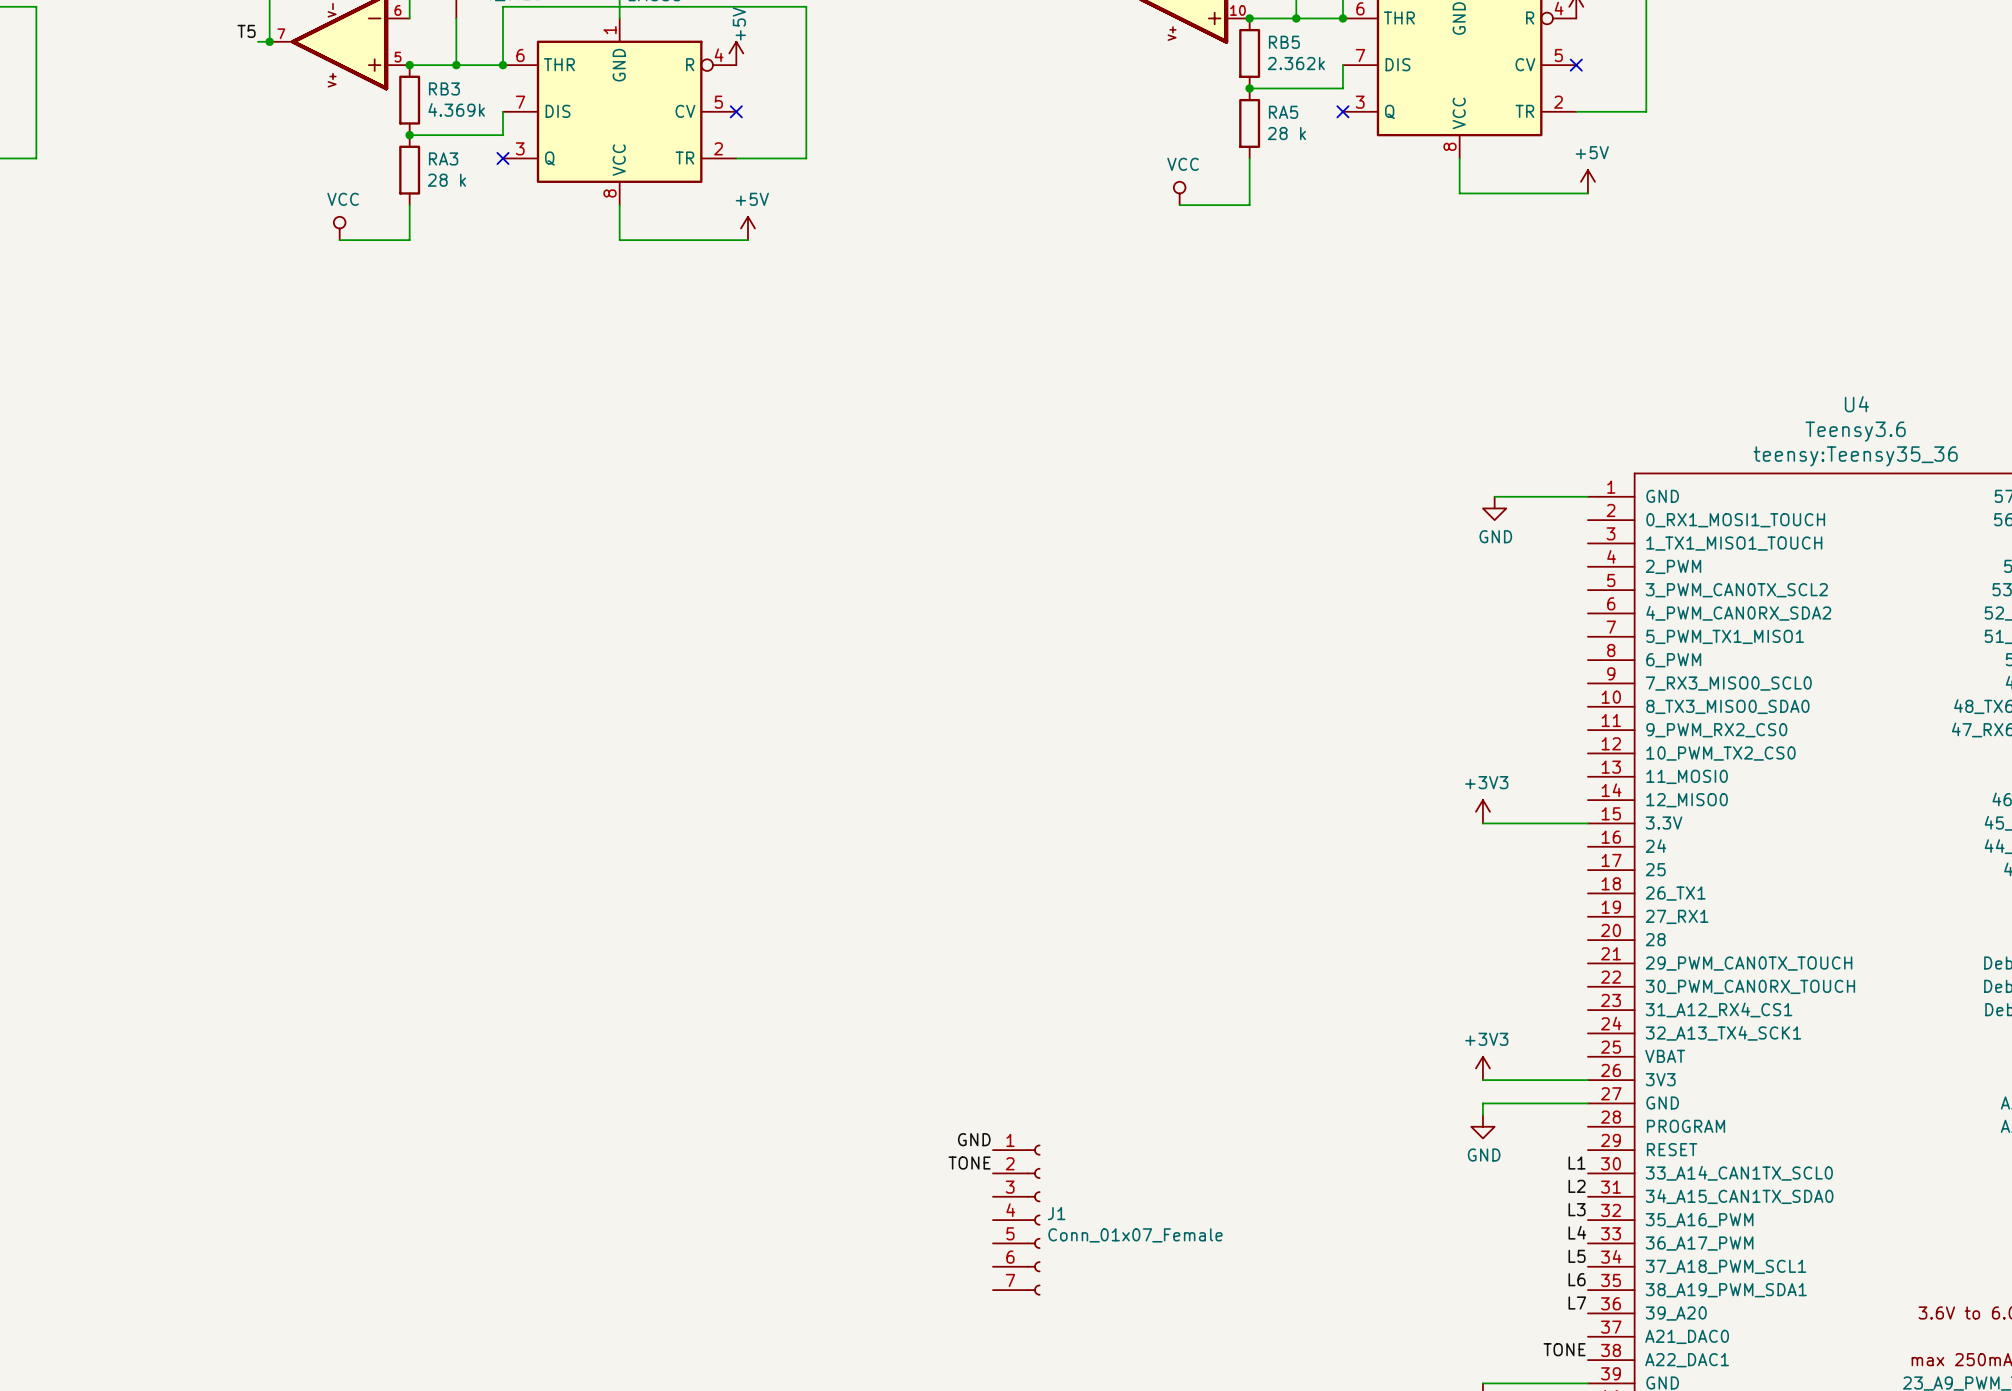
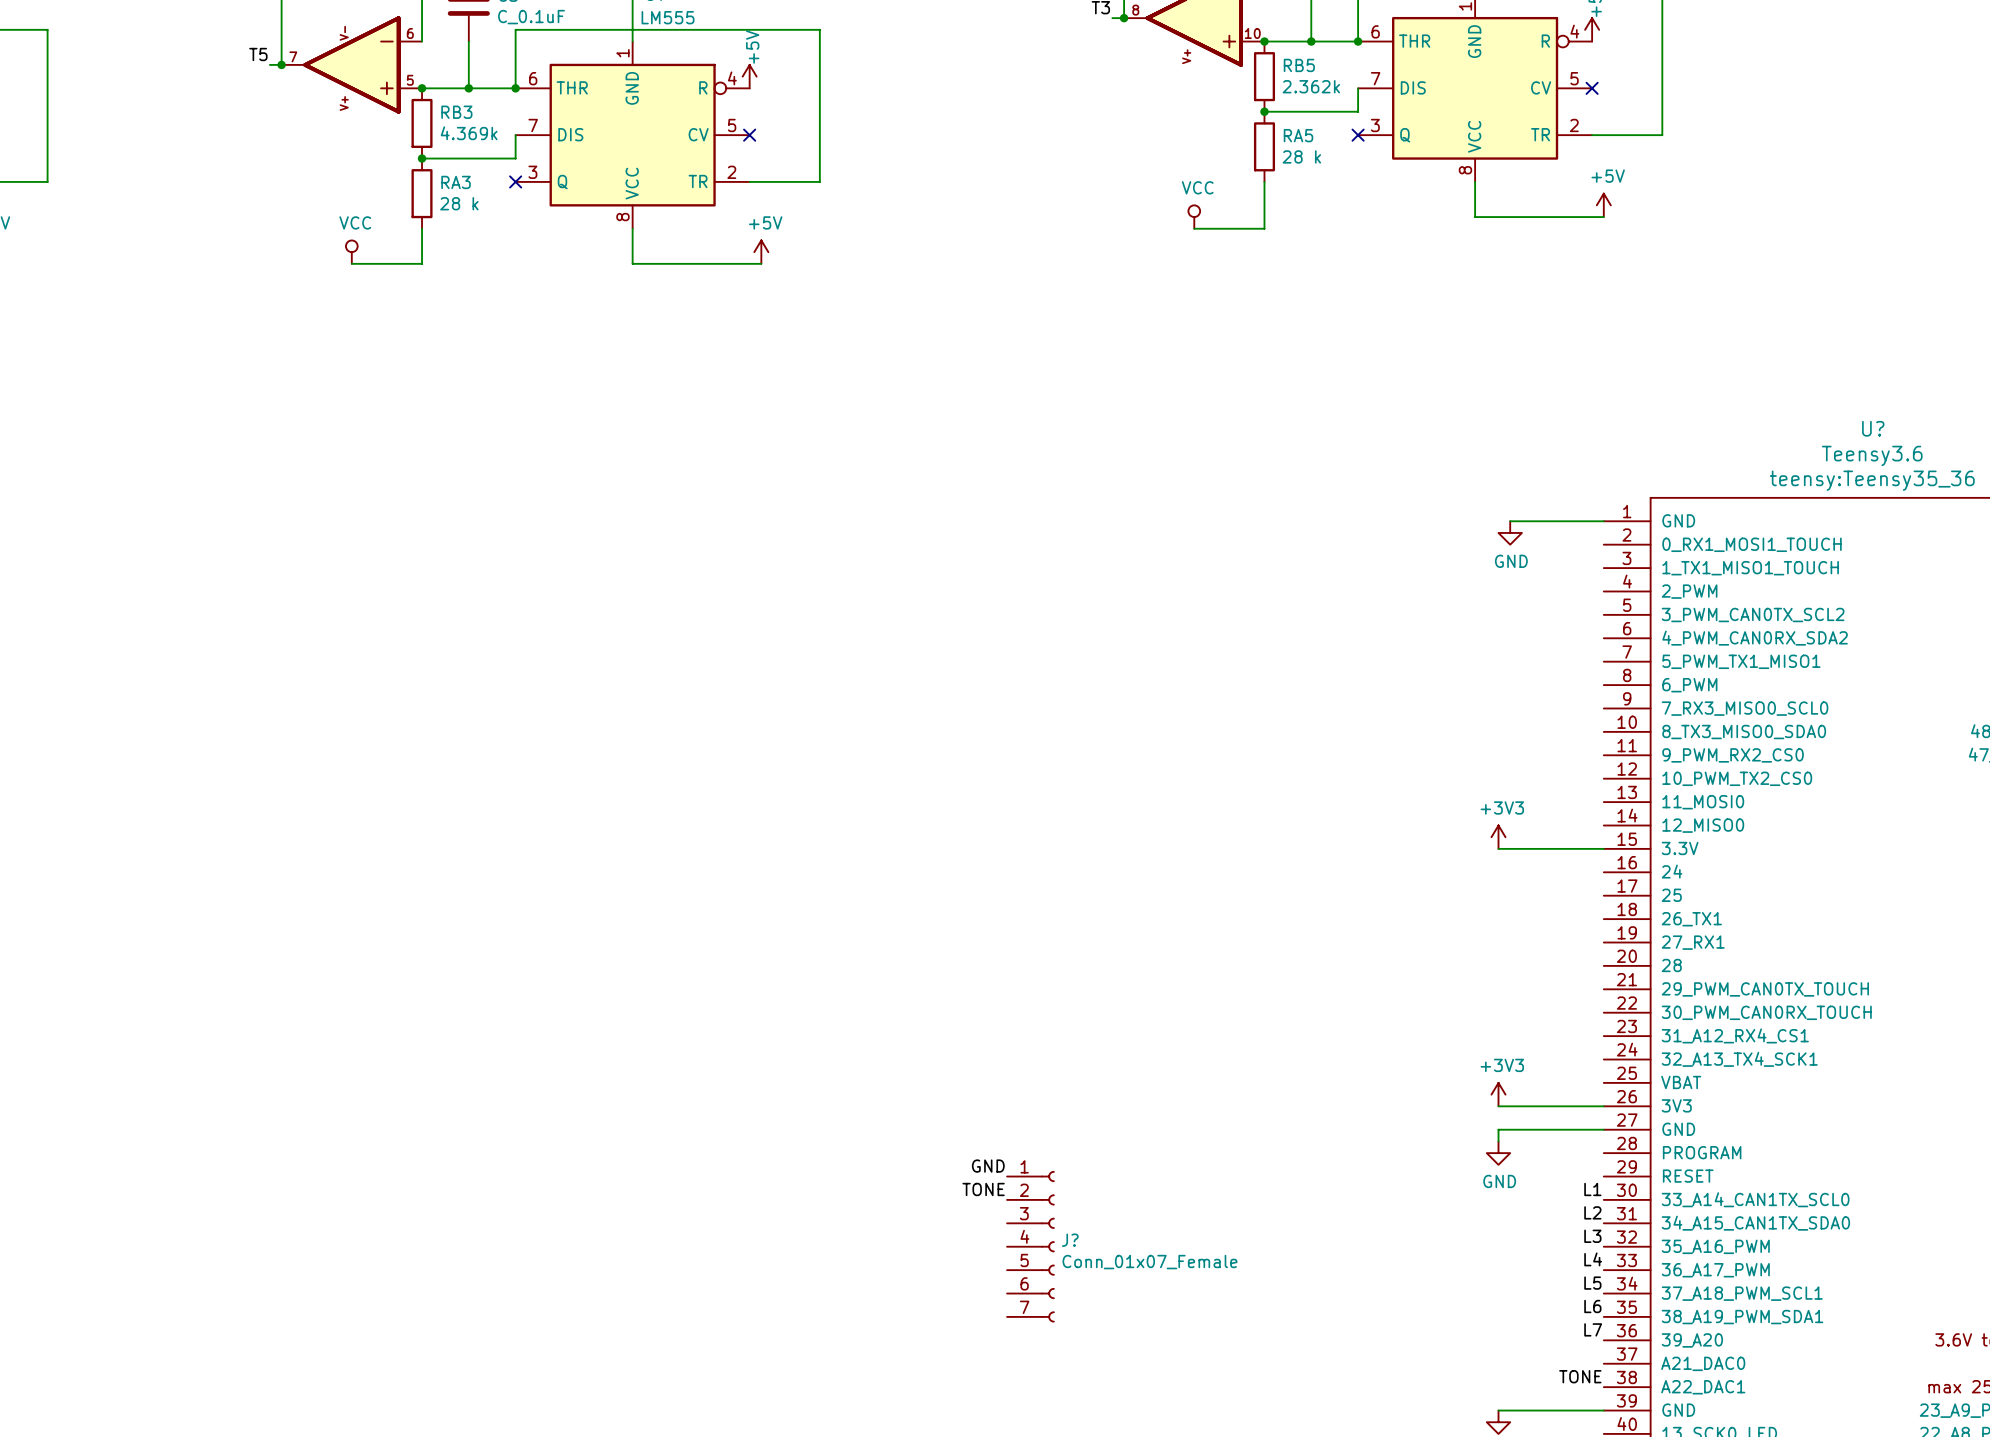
U4 name: U4 (1856, 404) -> U? (1873, 428)
J1 name: J1 (1056, 1213) -> J? (1070, 1240)

